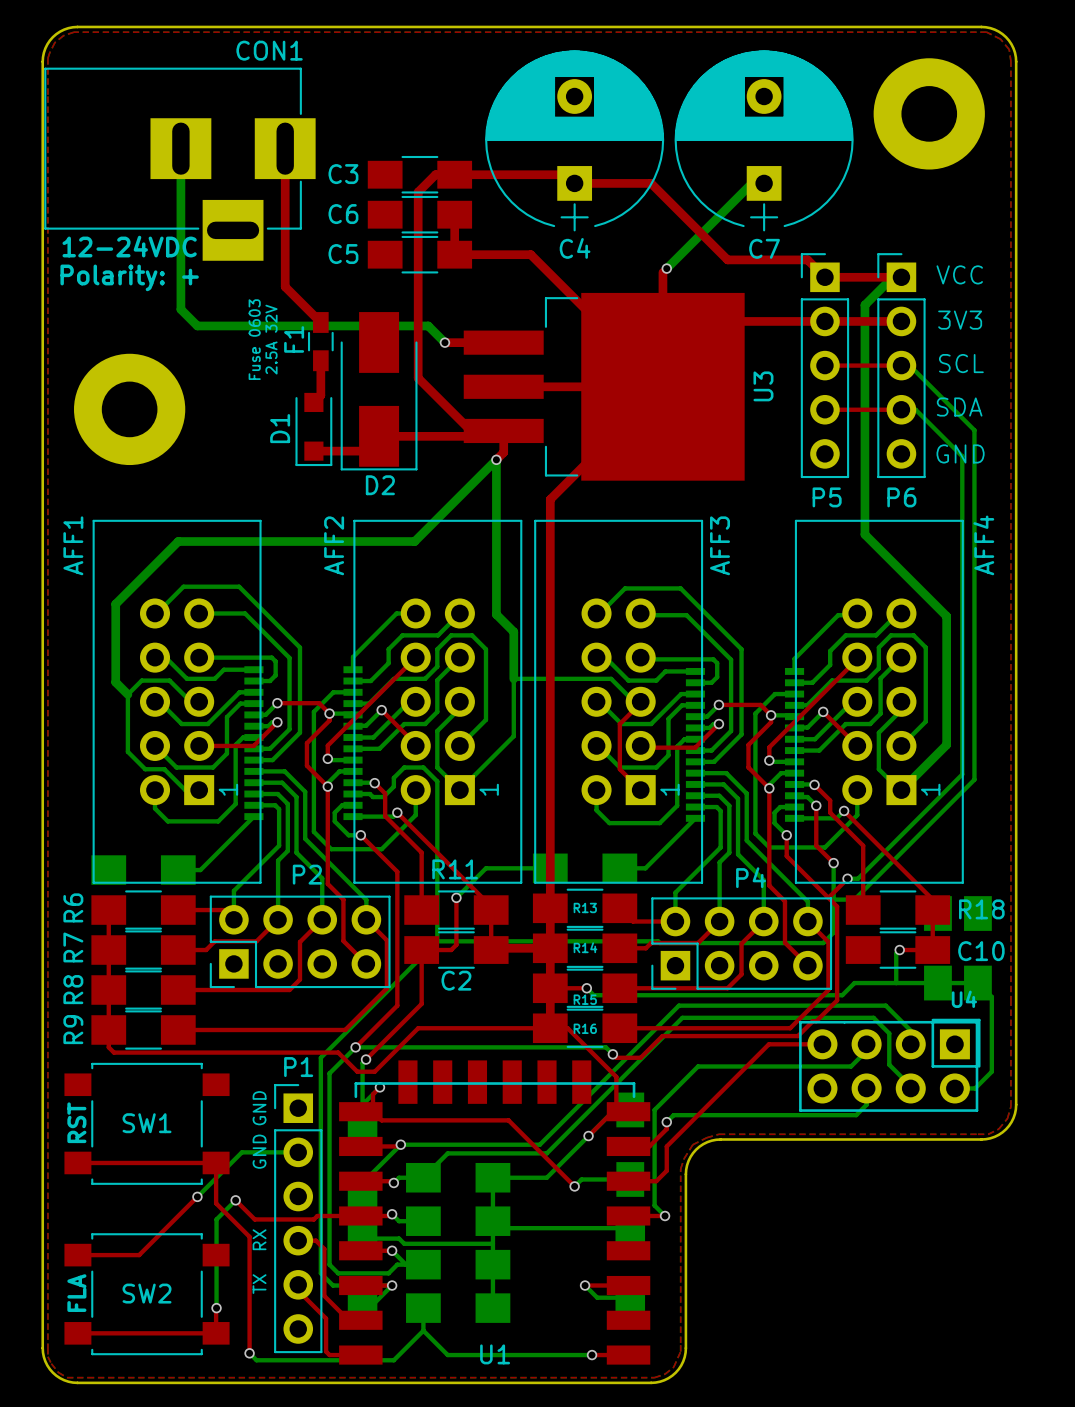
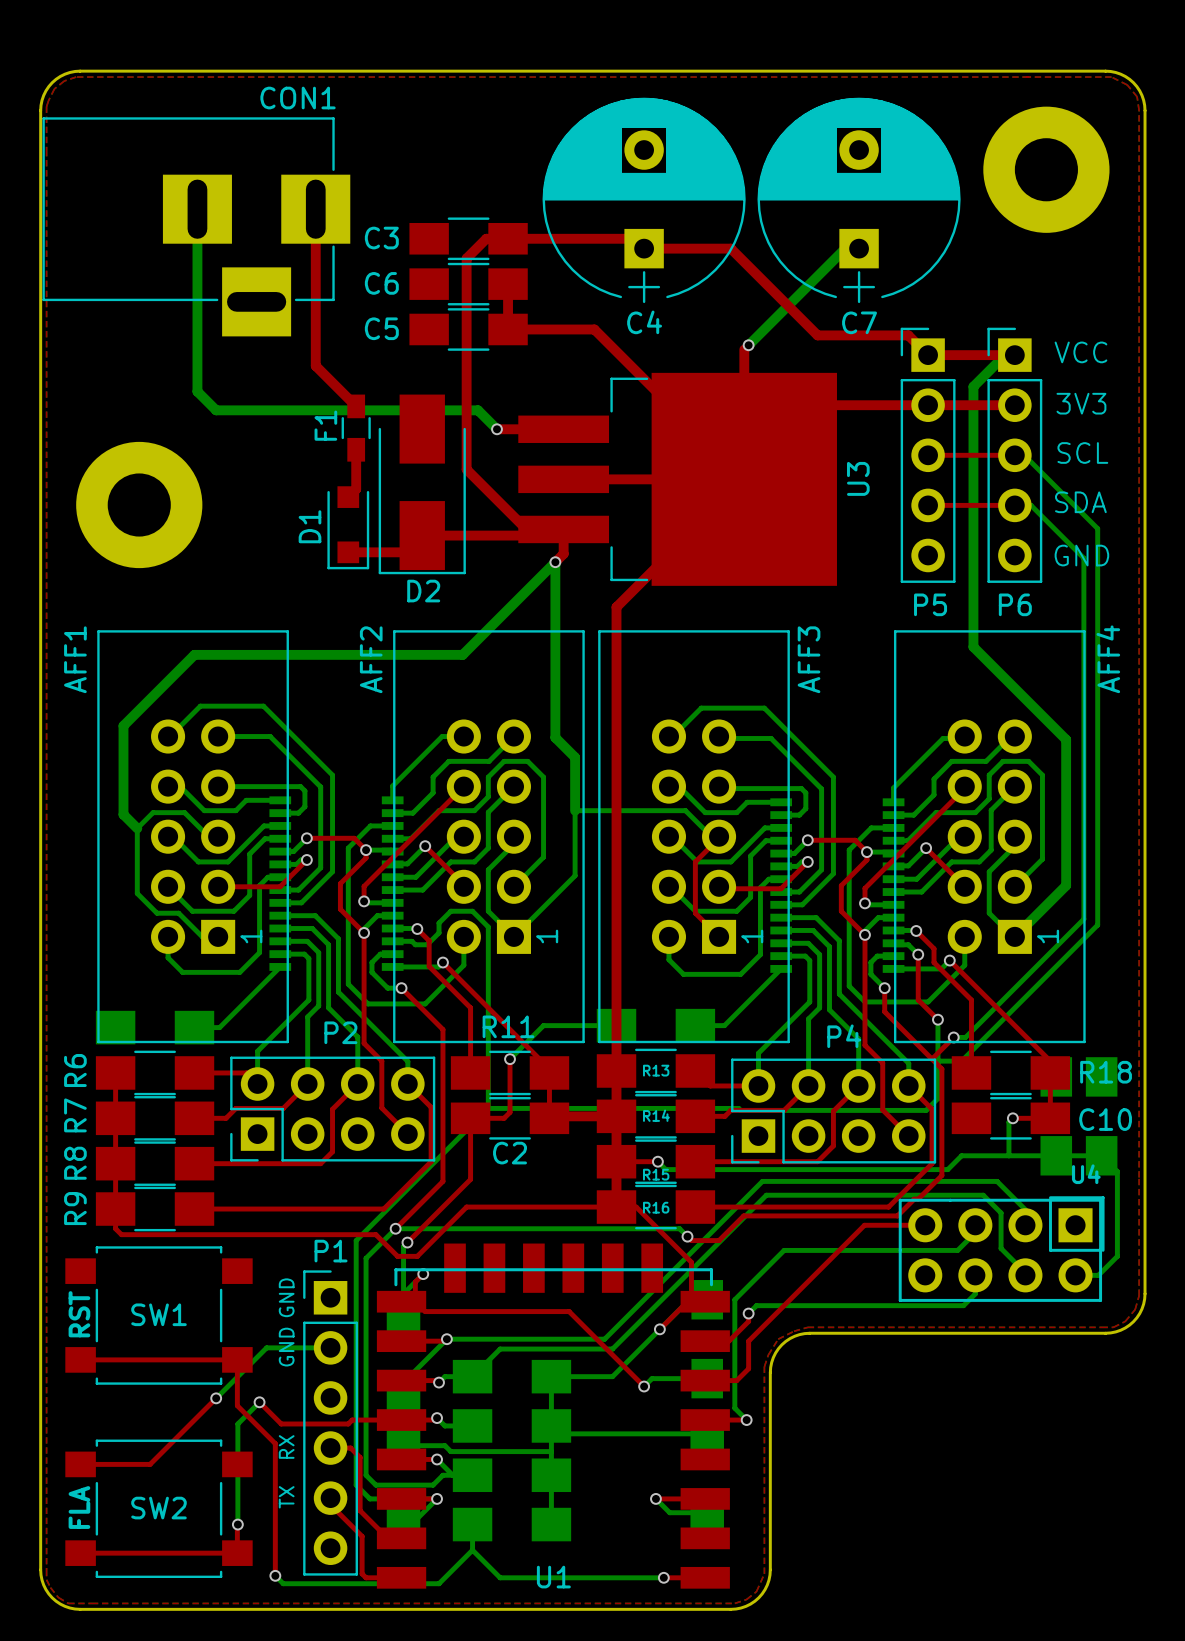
text: 12-24VDC (129, 246) -> none
text: Polarity: + (129, 277) -> none
text: Fuse 0603 (254, 339) -> none
text: 2.5A 32V (271, 339) -> none

